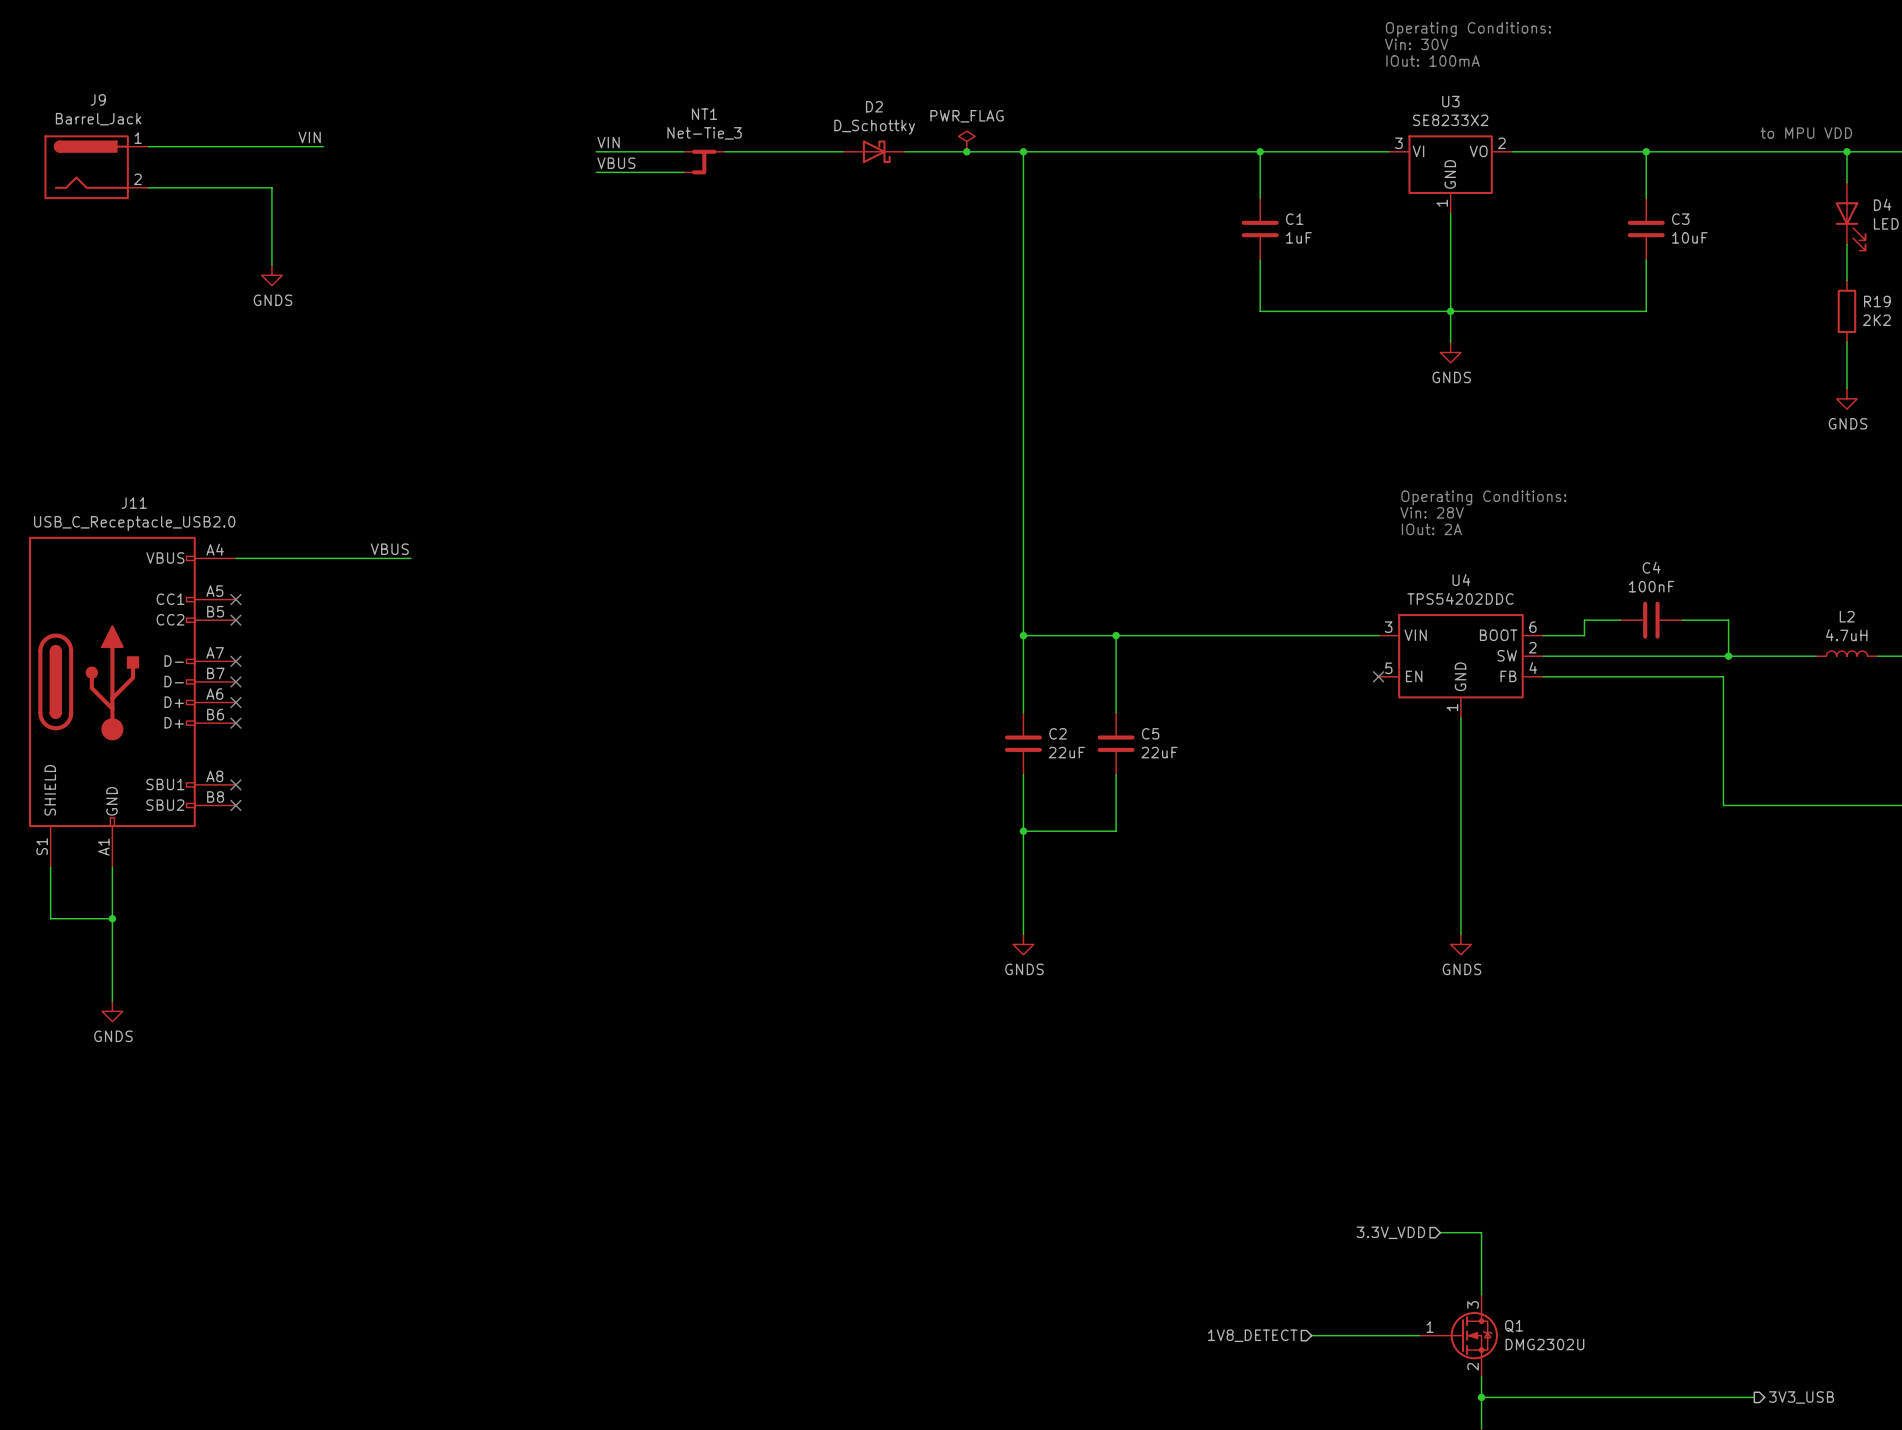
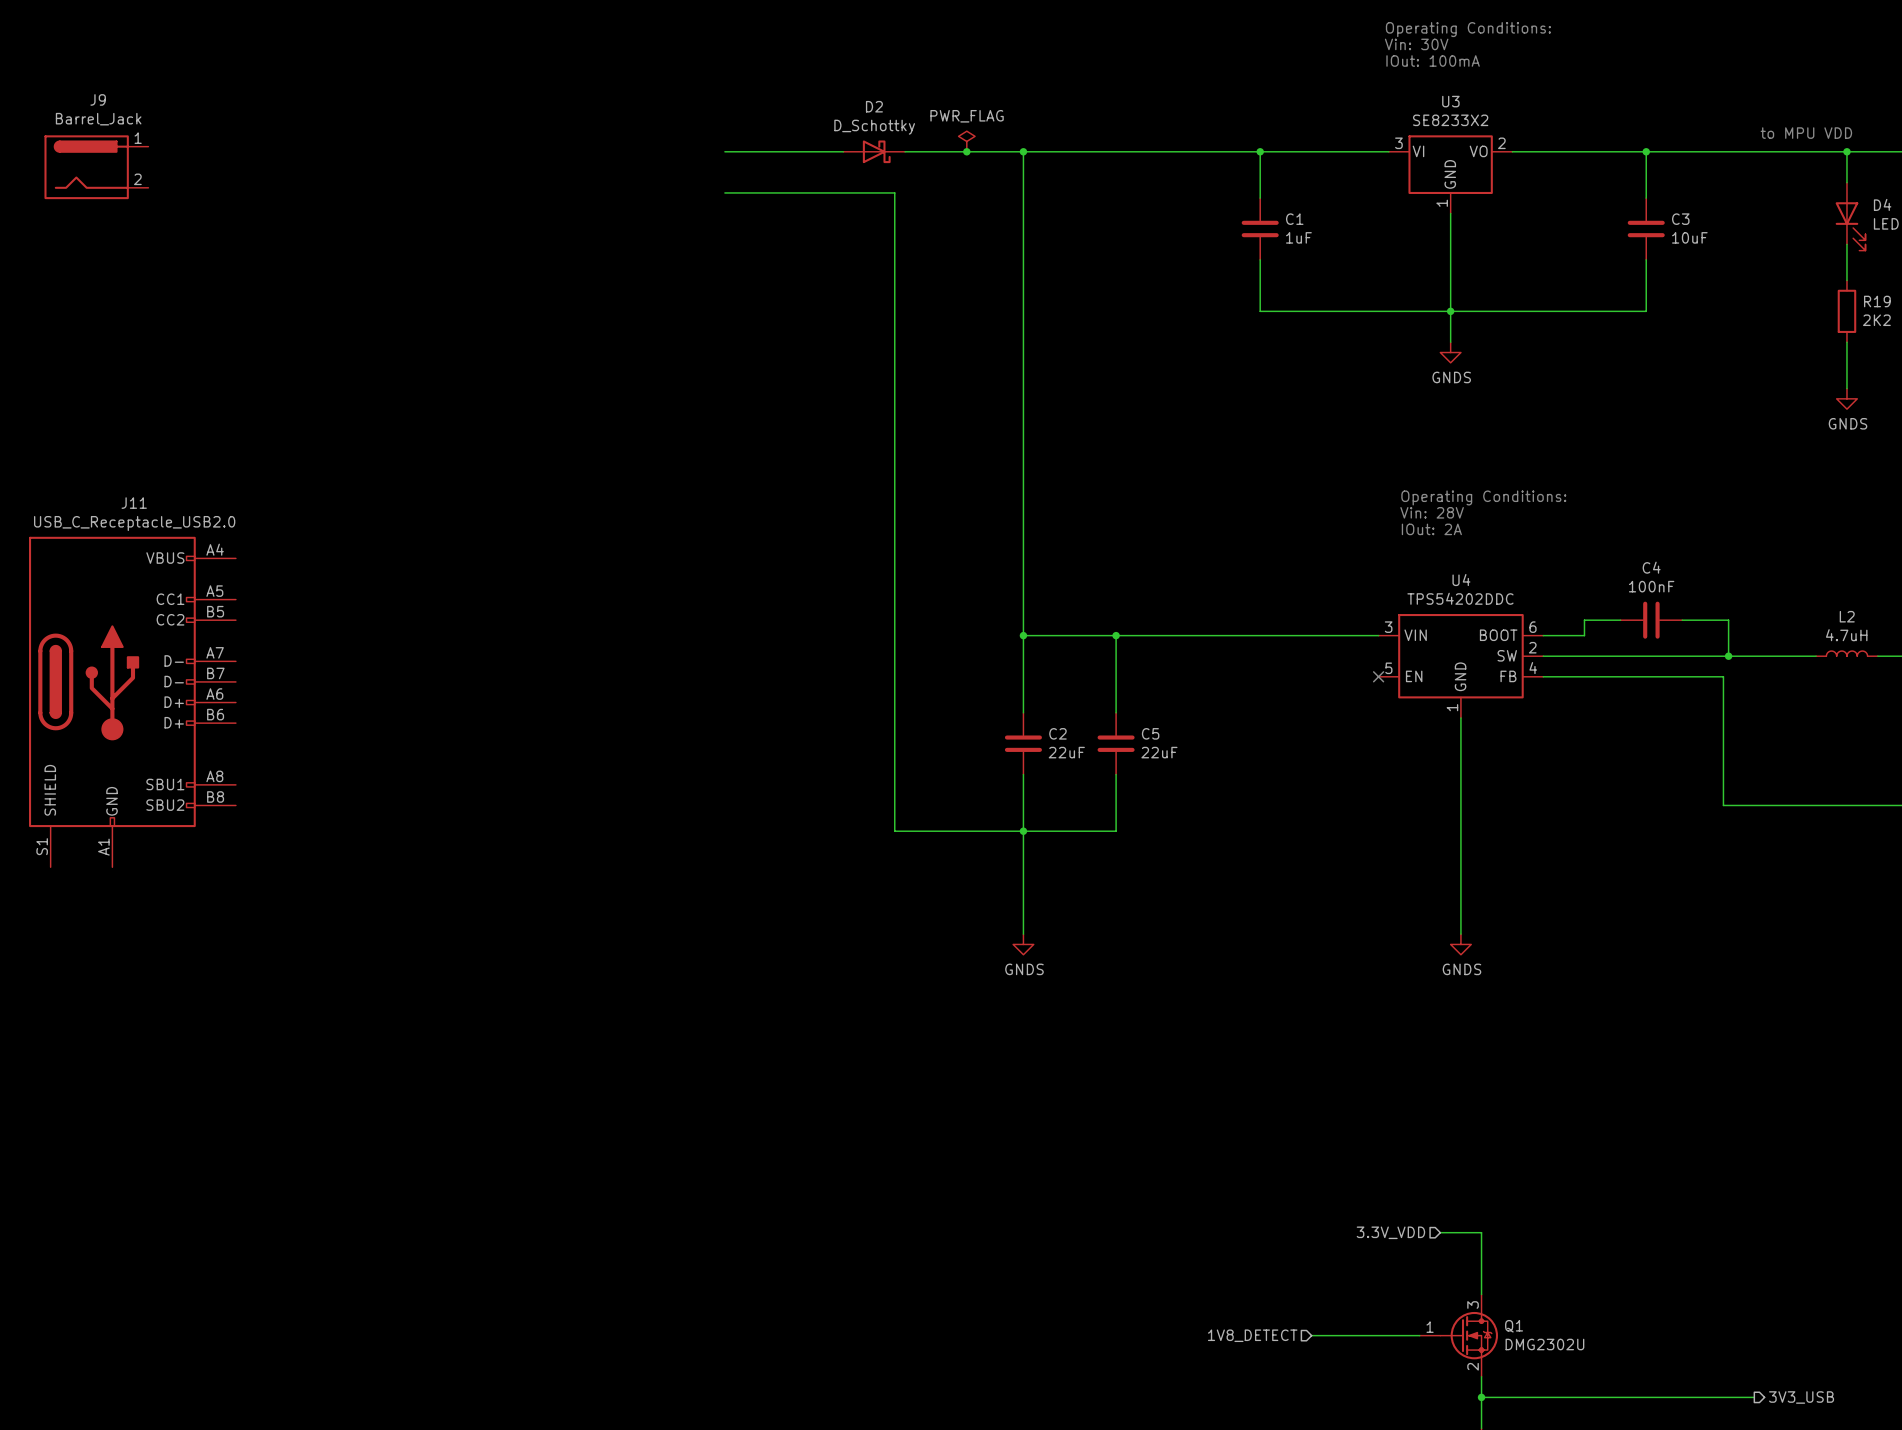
label: VIN (309, 137) -> none
label: VIN (608, 142) -> none
wire: (148, 146) (323, 146) -> none
wire: (596, 151) (683, 151) -> none
NT1: Net-Tie_3 (704, 162) -> none
label: VBUS (616, 163) -> none
wire: (596, 172) (683, 172) -> none
wire: (148, 187) (271, 187) (271, 265) -> none
wire: none -> (724, 192) (894, 192) (894, 831) (1023, 831)
power symbol: GNDS (271, 275) -> none
label: VBUS (389, 549) -> none
wire: (235, 558) (410, 558) -> none
no-connect mark: (235, 599) -> none
no-connect mark: (235, 620) -> none
no-connect mark: (235, 661) -> none
no-connect mark: (235, 681) -> none
no-connect mark: (235, 702) -> none
no-connect mark: (235, 723) -> none
no-connect mark: (235, 784) -> none
no-connect mark: (235, 805) -> none
wire: (50, 867) (50, 918) (112, 918) -> none
wire: (112, 867) (112, 1001) -> none
junction: (112, 918) -> none
power symbol: GNDS (112, 1011) -> none

